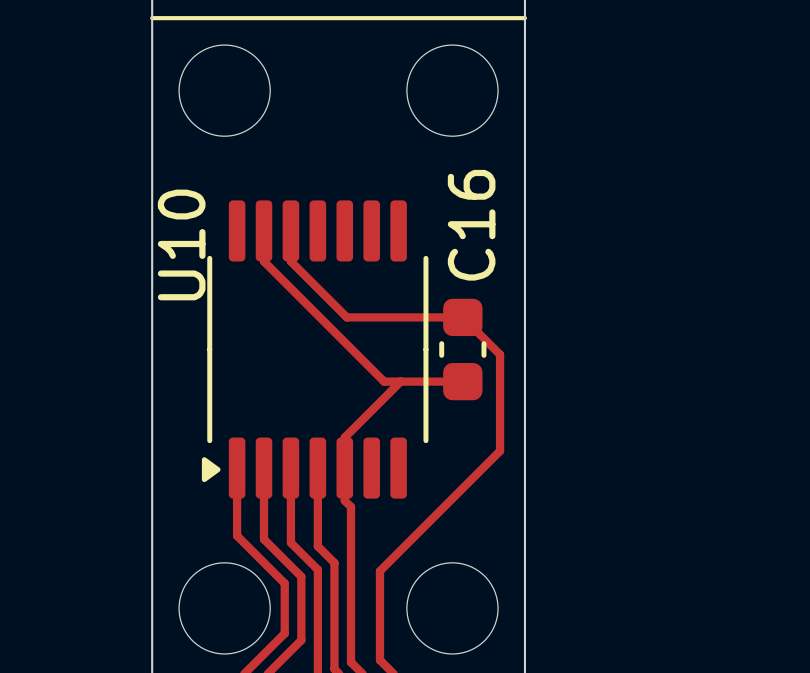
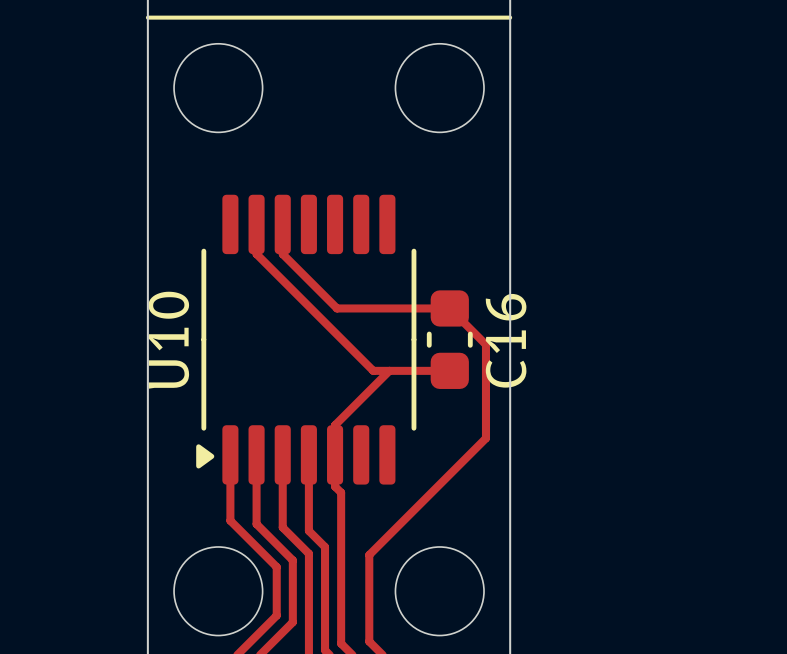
C16 name position: C16 (471, 225) -> C16 (506, 340)
U10 name position: U10 (181, 244) -> U10 (168, 340)

